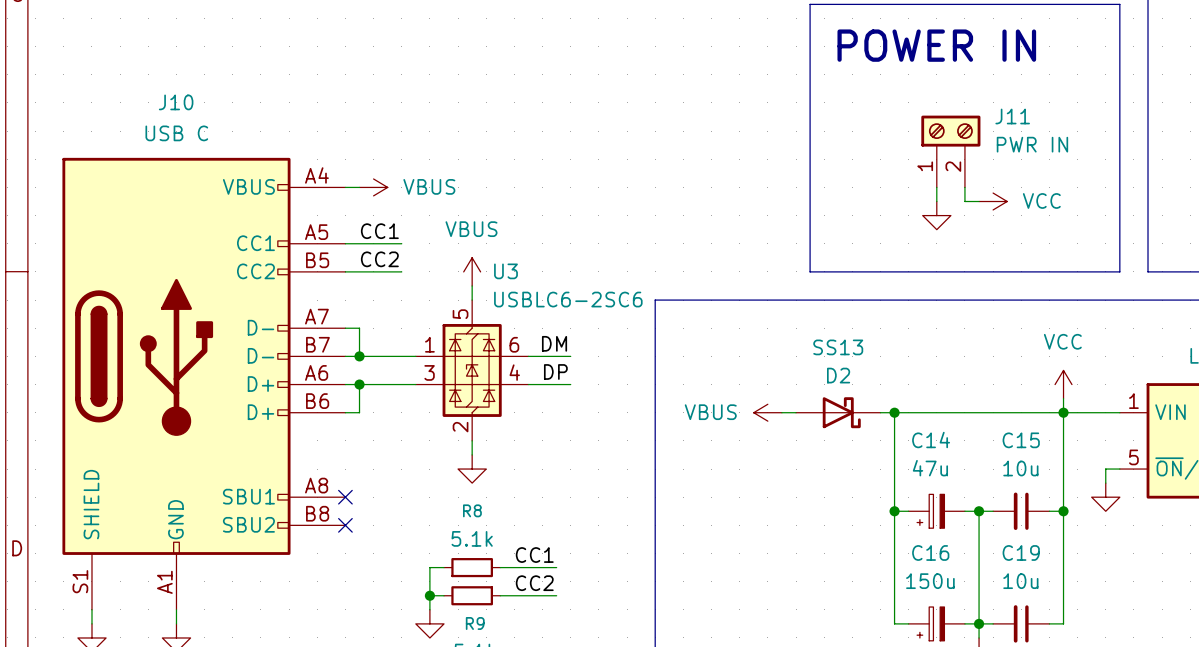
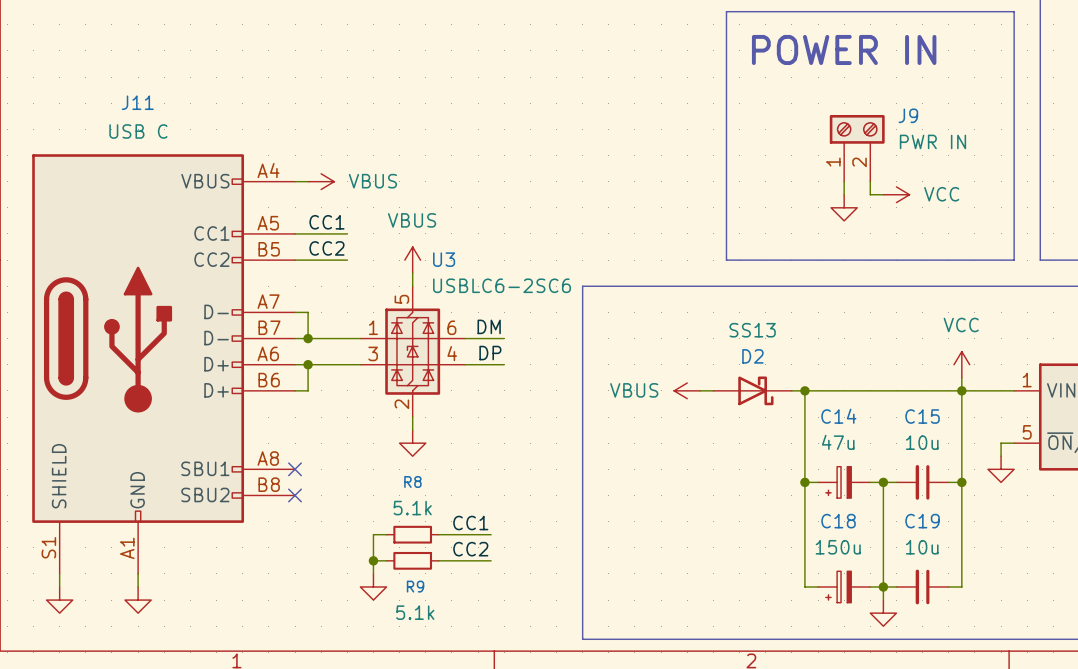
J10 name: J10 (176, 102) -> J11 (137, 102)
J11 name: J11 (1012, 116) -> J9 (908, 115)
C16 name: C16 (930, 552) -> C18 (838, 521)

